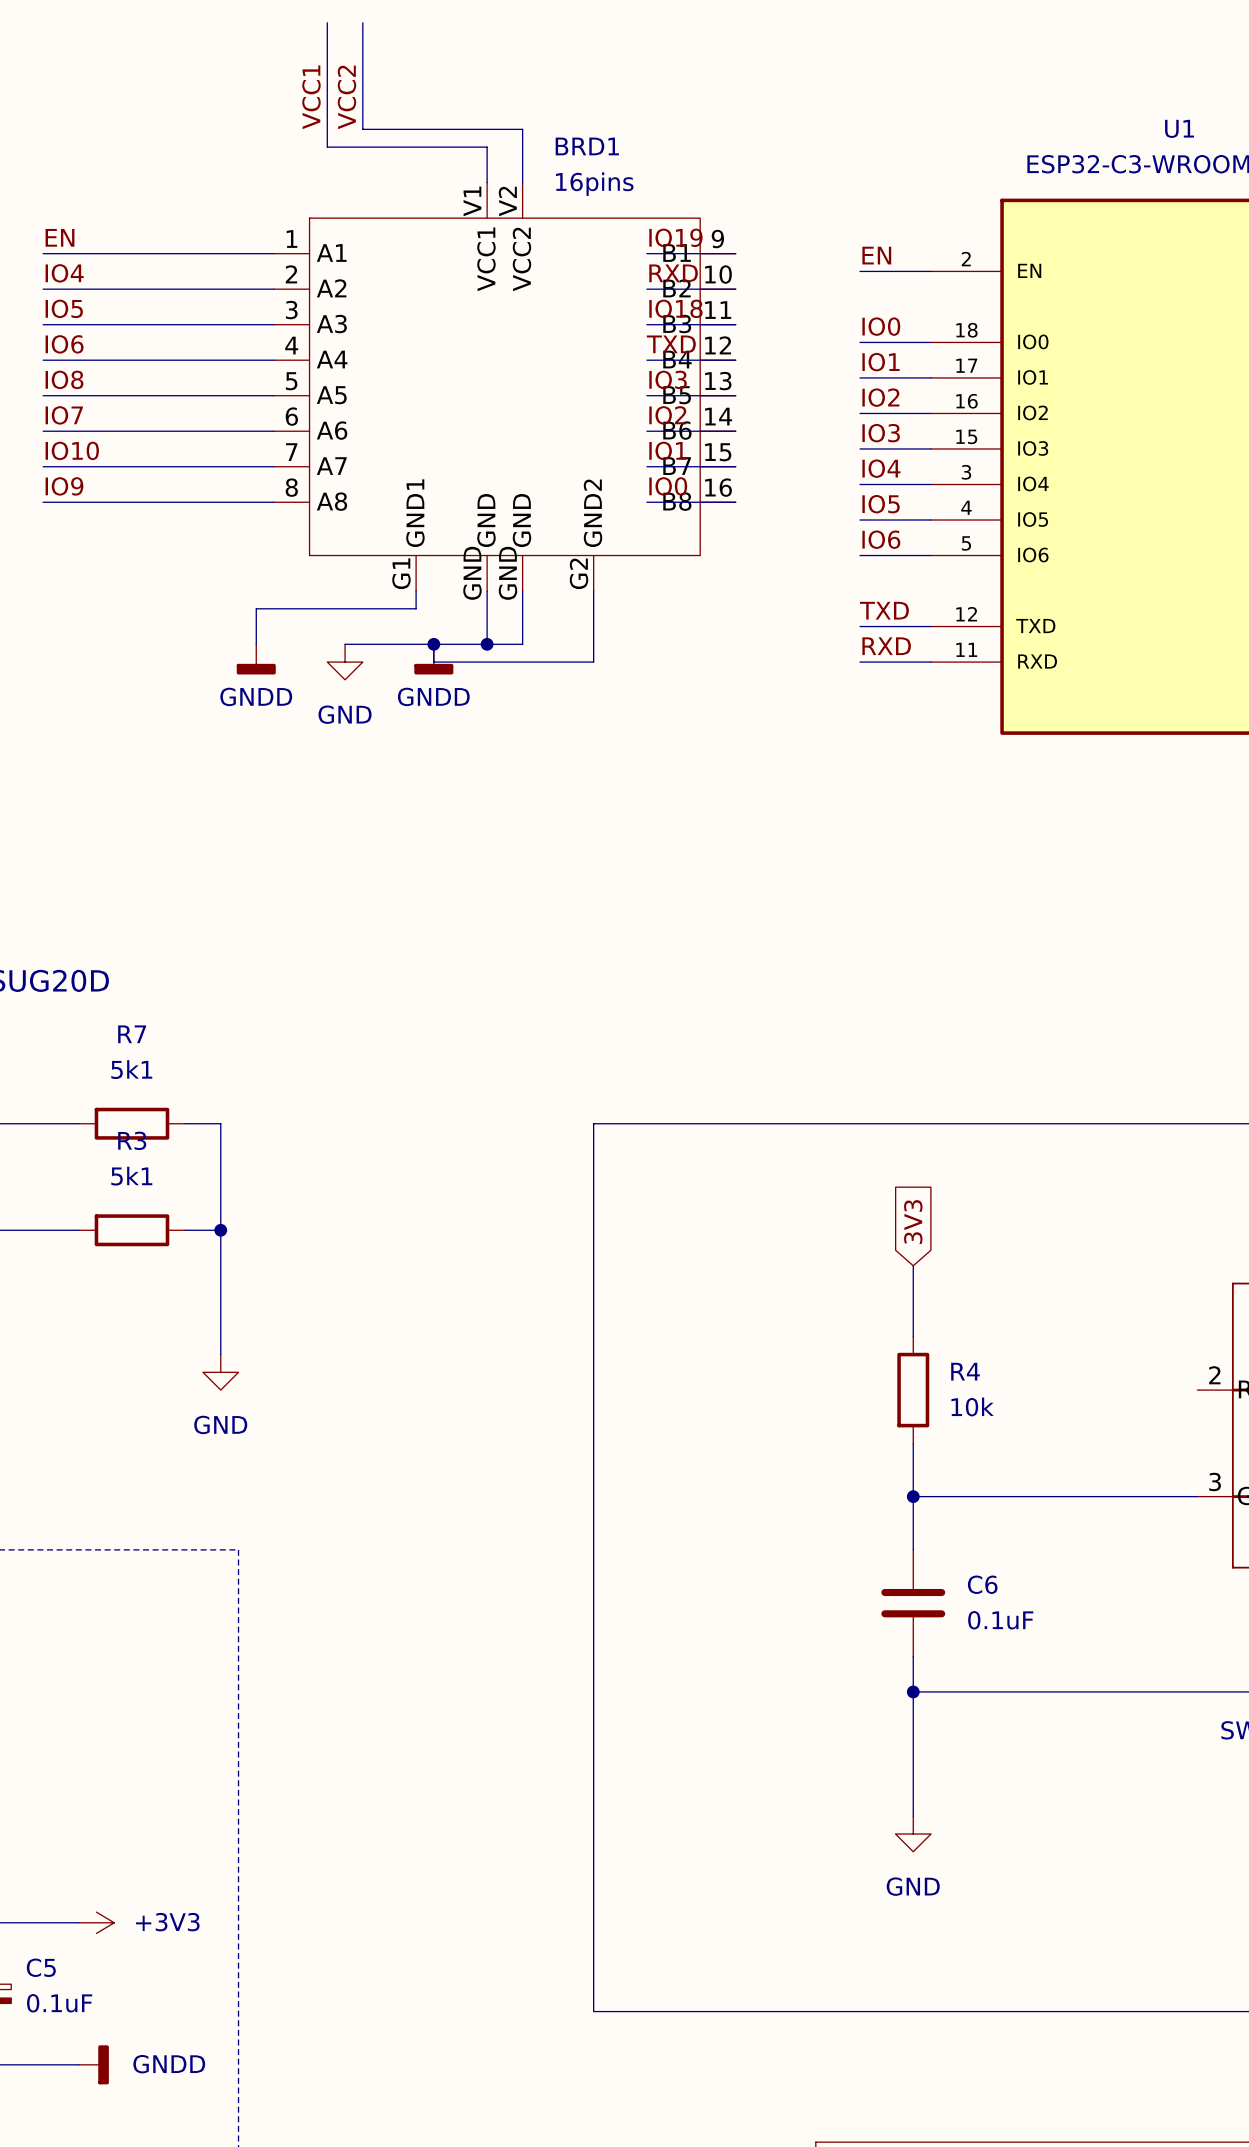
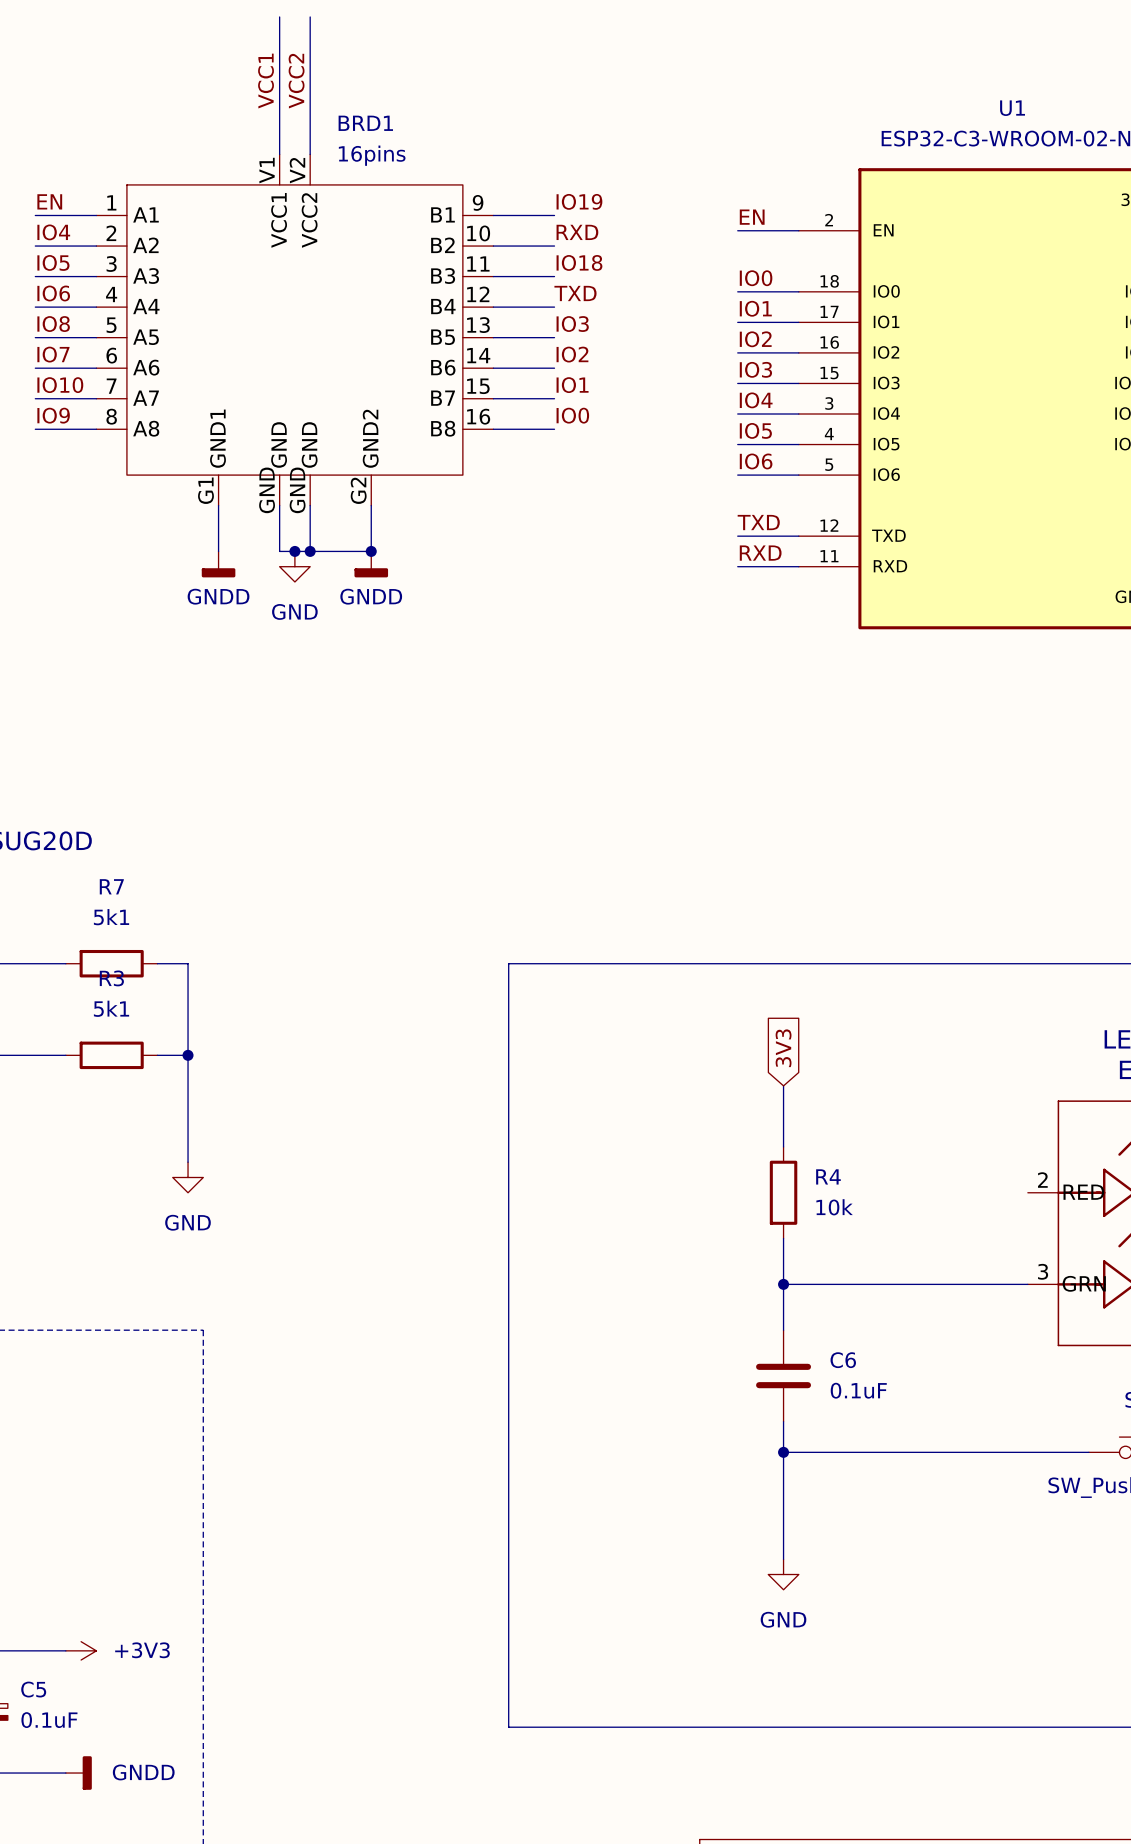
wire: (362, 129) (522, 129) (522, 182) -> (310, 108) (310, 154)
wire: (327, 147) (487, 147) (487, 182) -> (279, 123) (279, 154)
wire: (114, 253) (274, 253) -> none
wire: (646, 253) (735, 253) -> (554, 215) (493, 215)
wire: (114, 289) (274, 289) -> none
wire: (646, 289) (735, 289) -> (554, 246) (493, 246)
wire: (114, 324) (274, 324) -> none
wire: (646, 324) (735, 324) -> (554, 276) (493, 276)
wire: (114, 360) (274, 360) -> none
wire: (646, 360) (735, 360) -> (554, 307) (493, 307)
BRD1 position: (504, 386) -> (294, 330)
wire: (114, 395) (274, 395) -> none
wire: (646, 395) (735, 395) -> (554, 337) (493, 337)
wire: (114, 431) (274, 431) -> none
wire: (646, 431) (735, 431) -> (554, 368) (493, 368)
wire: (114, 466) (274, 466) -> none
wire: (646, 466) (735, 466) -> (554, 398) (493, 398)
wire: (114, 502) (274, 502) -> none
wire: (646, 502) (735, 502) -> (554, 429) (493, 429)
wire: none -> (279, 505) (279, 551) (294, 551)
wire: none -> (310, 505) (310, 551)
wire: (416, 591) (416, 608) (256, 608) -> (218, 505) (218, 520)
wire: (487, 591) (487, 644) -> (371, 505) (371, 551)
wire: (522, 591) (522, 644) (433, 644) (433, 662) (593, 662) (593, 591) -> none
junction: none -> (294, 551)
junction: none -> (310, 551)
junction: (487, 644) -> none

